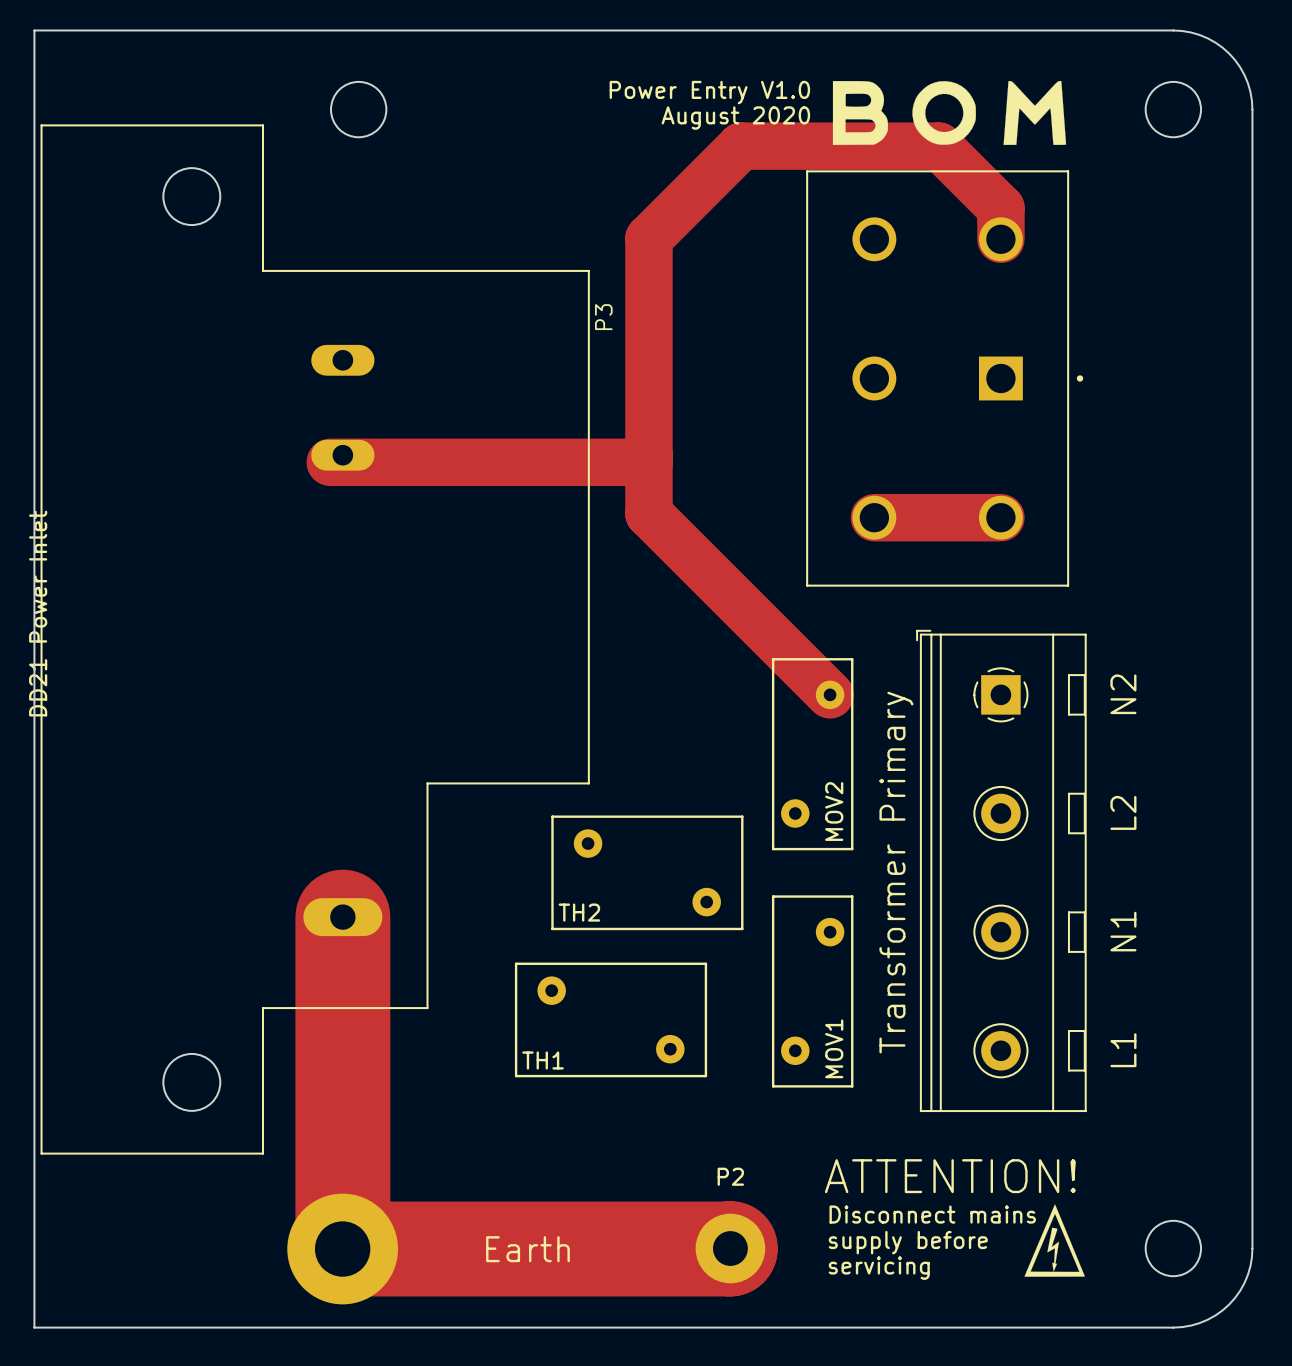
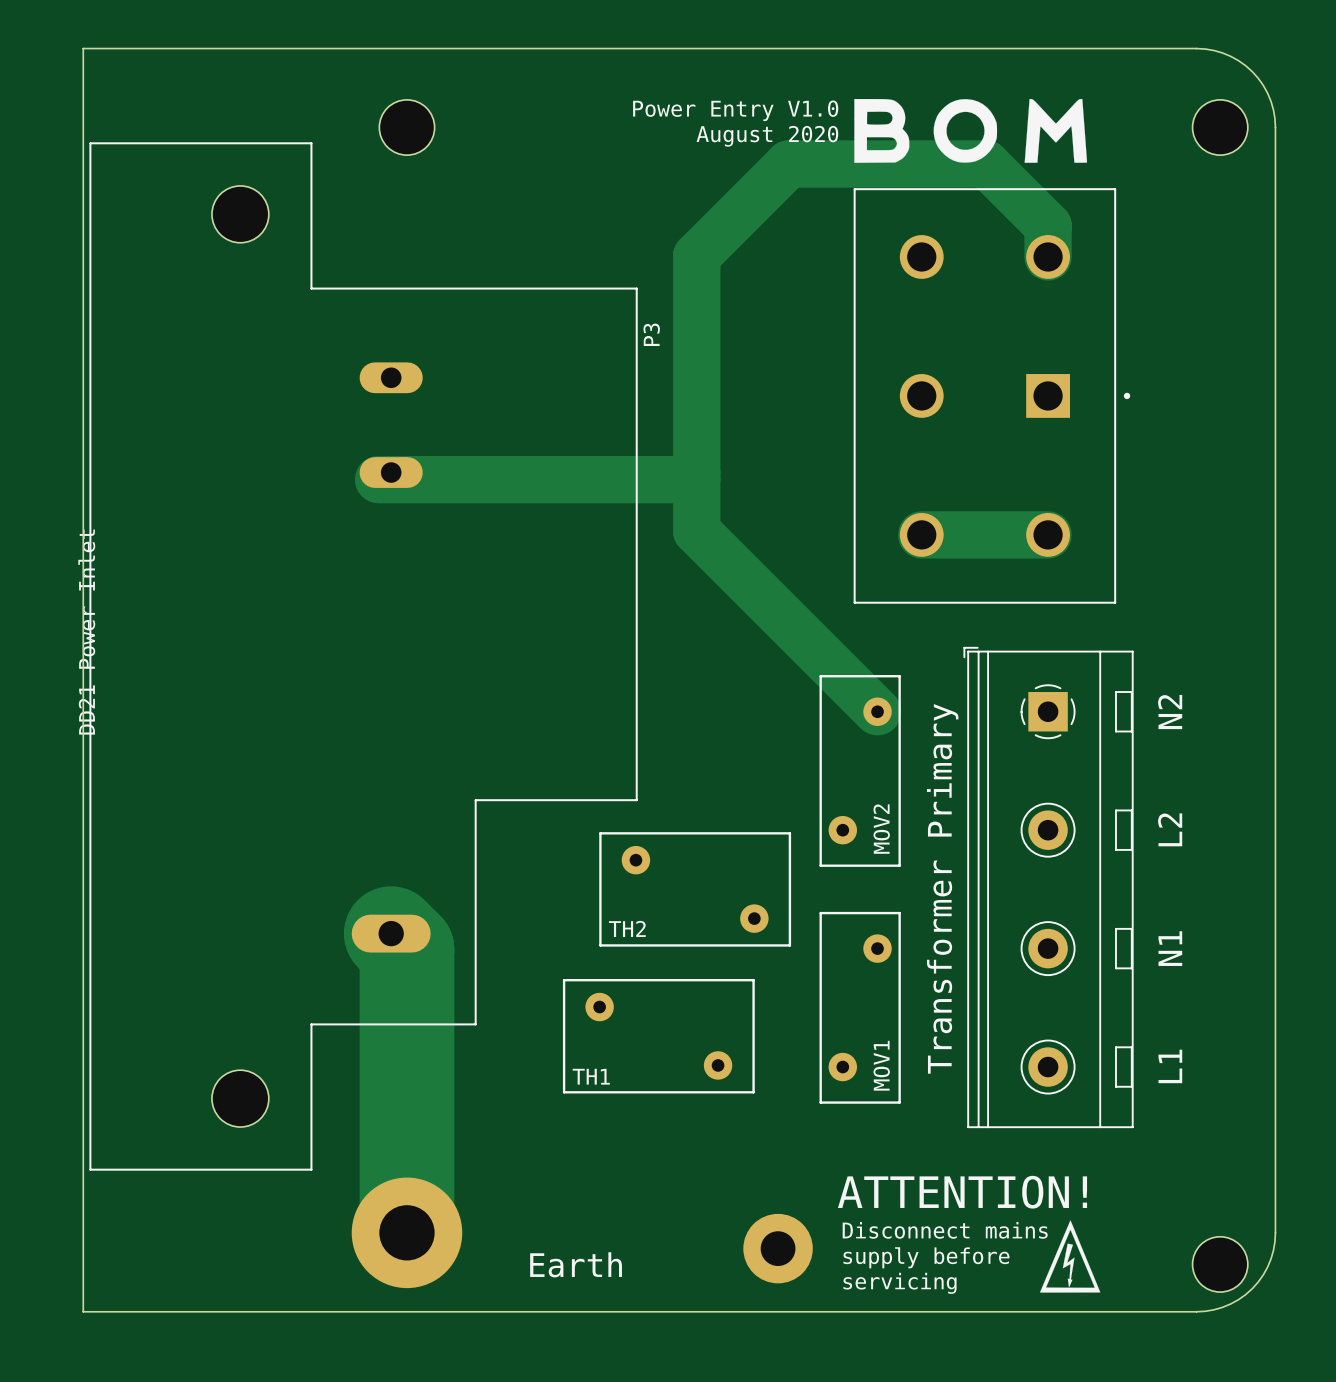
board edge: (1149, 30) (1190, 32) (1215, 42) (1229, 53) (1240, 67) (1248, 83) (1251, 100) (1252, 1248) (1248, 1274) (1235, 1297) (1222, 1310) (1207, 1319) (1190, 1325) (1173, 1327) (34, 1327) (34, 1295) -> (1196, 48) (1222, 52) (1238, 60) (1252, 71) (1263, 85) (1271, 101) (1275, 127) (1275, 1232) (1271, 1258) (1258, 1282) (1245, 1294) (1230, 1303) (1214, 1309) (1196, 1311) (83, 1311)
text position: Power Entry V1.0 (709, 92) -> Power Entry V1.0 (735, 110)
drawing position: (949, 113) -> (970, 130)
text position: August 2020 (735, 118) -> August 2020 (767, 136)
track: (342, 917) (342, 1248) -> (391, 933) (406, 949) (406, 1232)
P2 name: P2 (730, 1176) -> none
text position: ATTENTION! (950, 1176) -> ATTENTION! (962, 1192)
text position: Disconnect mains (932, 1214) -> Disconnect mains (945, 1230)
drawing position: (1054, 1240) -> (1070, 1256)
text position: supply before (908, 1242) -> supply before (926, 1257)
track: (730, 1248) (342, 1249) -> none
P2 position: (730, 1248) -> (778, 1248)
part position: (342, 1249) -> (406, 1232)
text position: servicing (879, 1268) -> servicing (900, 1283)

